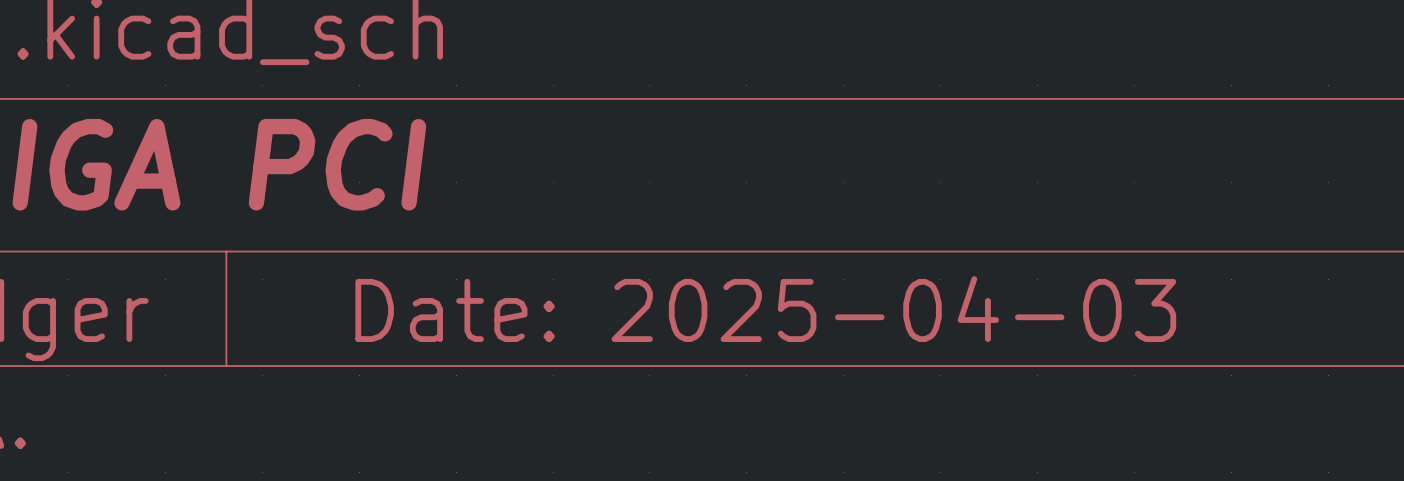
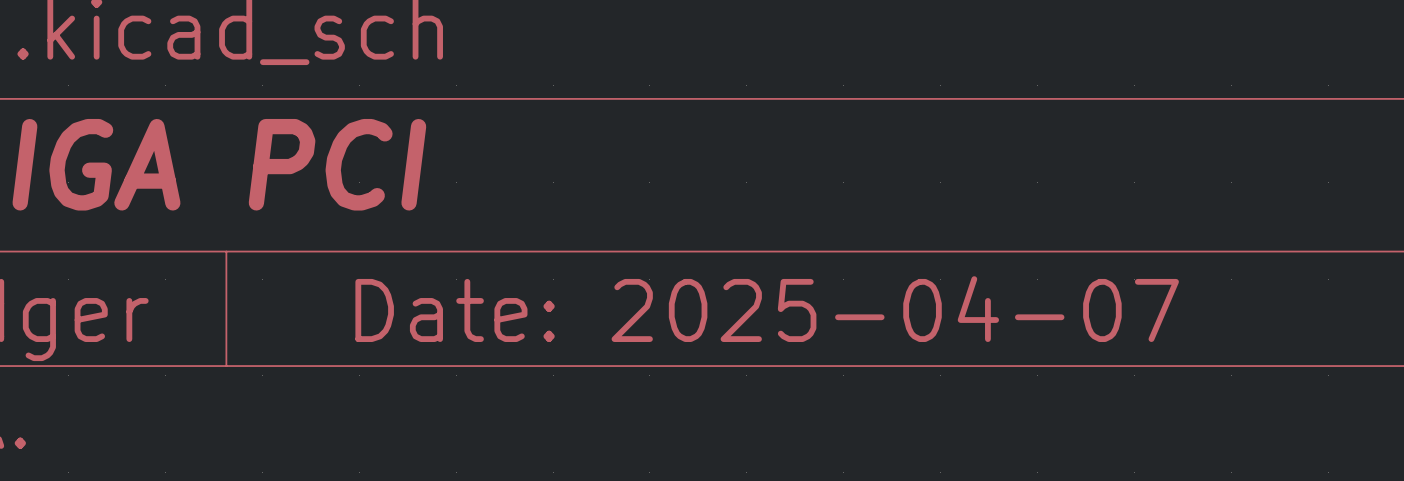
title block: Date: 2025-04-03 (765, 309) -> Date: 2025-04-07 (767, 309)

